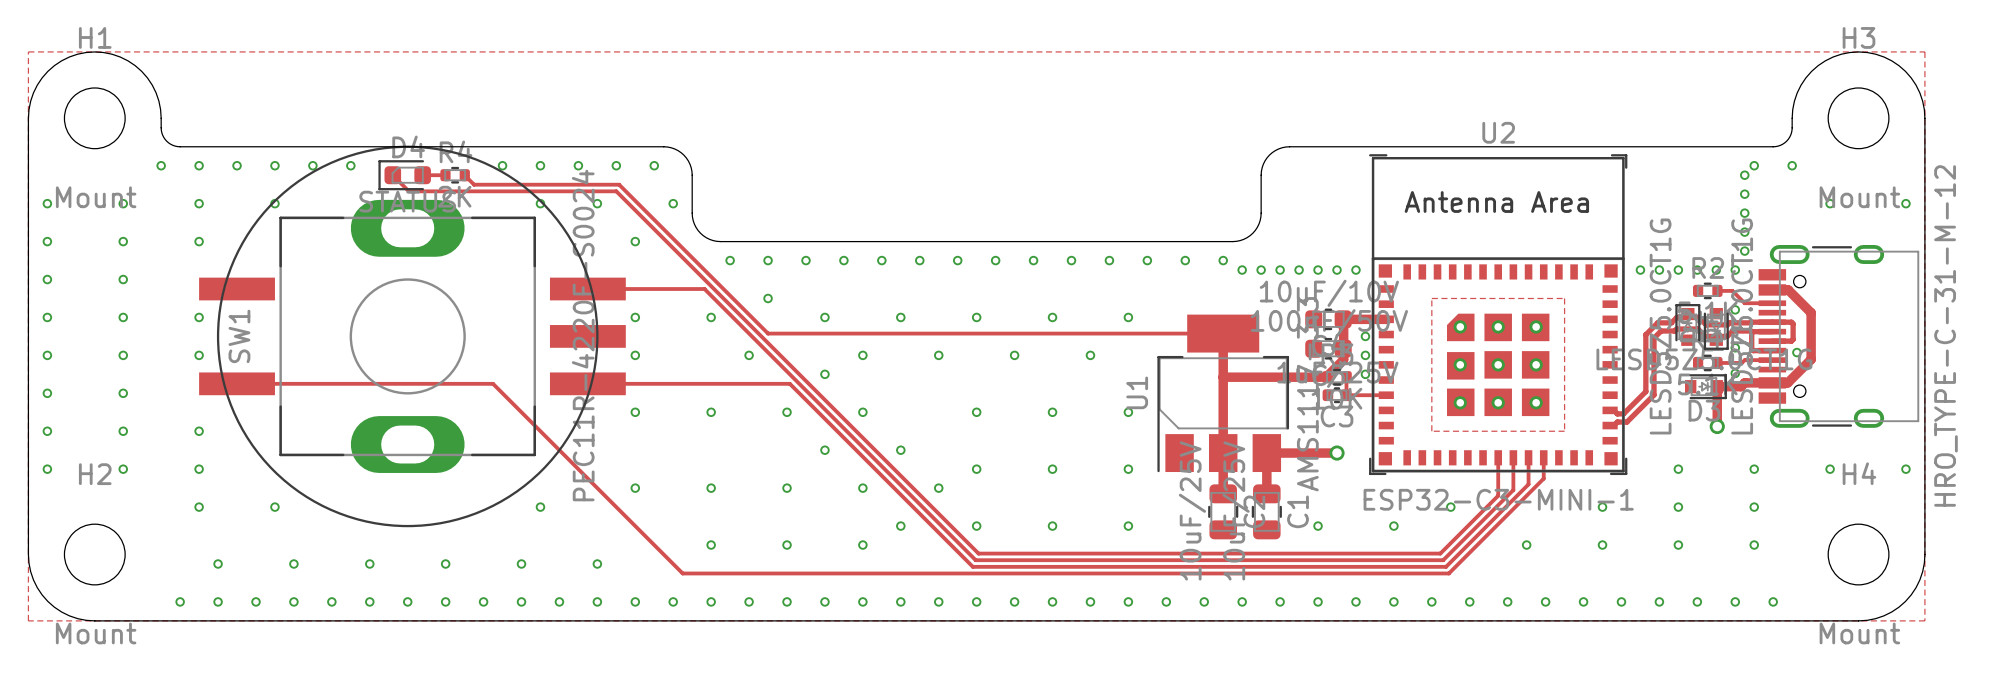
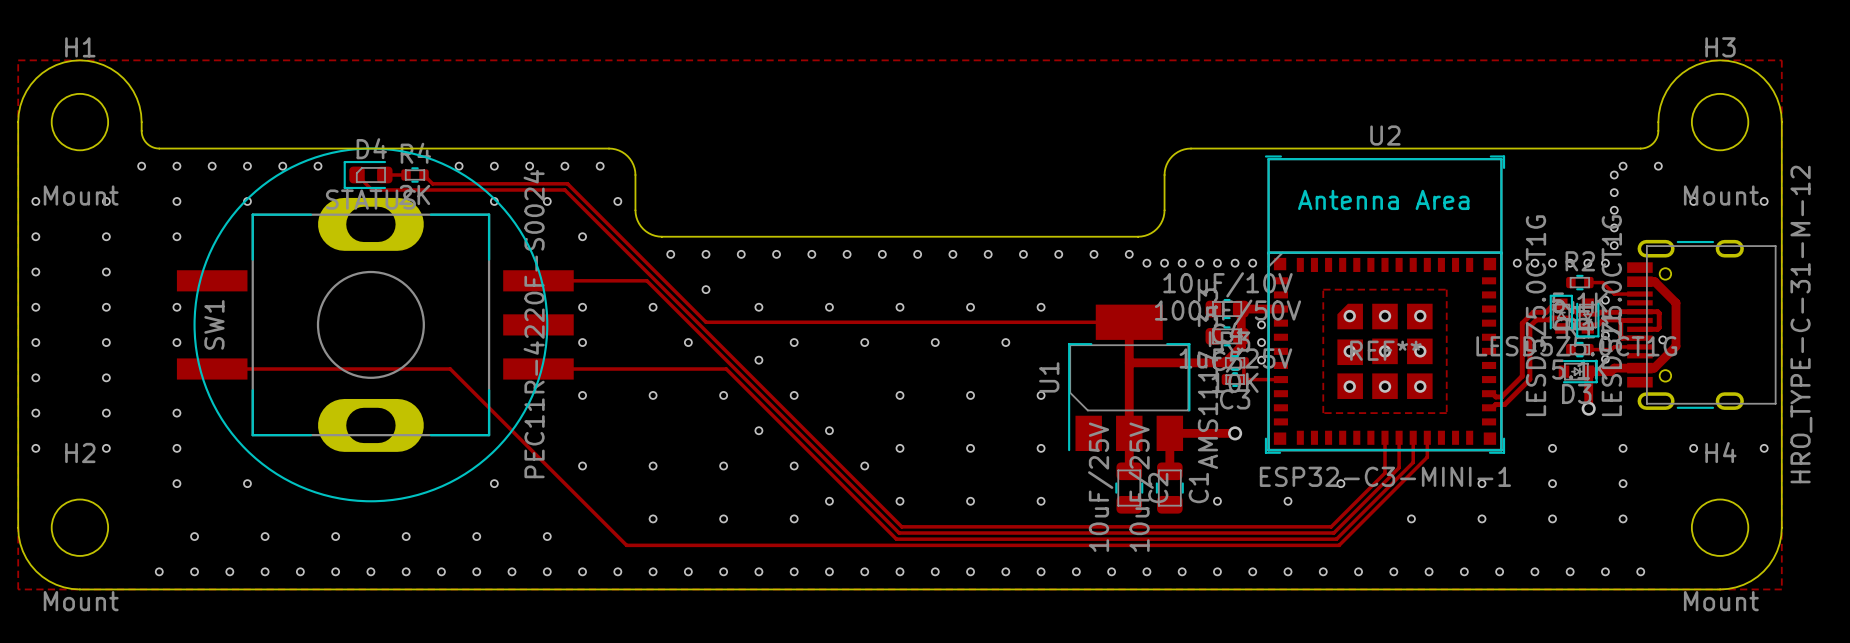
U2 footprint: [1369, 154, 1628, 476] -> [1264, 155, 1506, 454]

